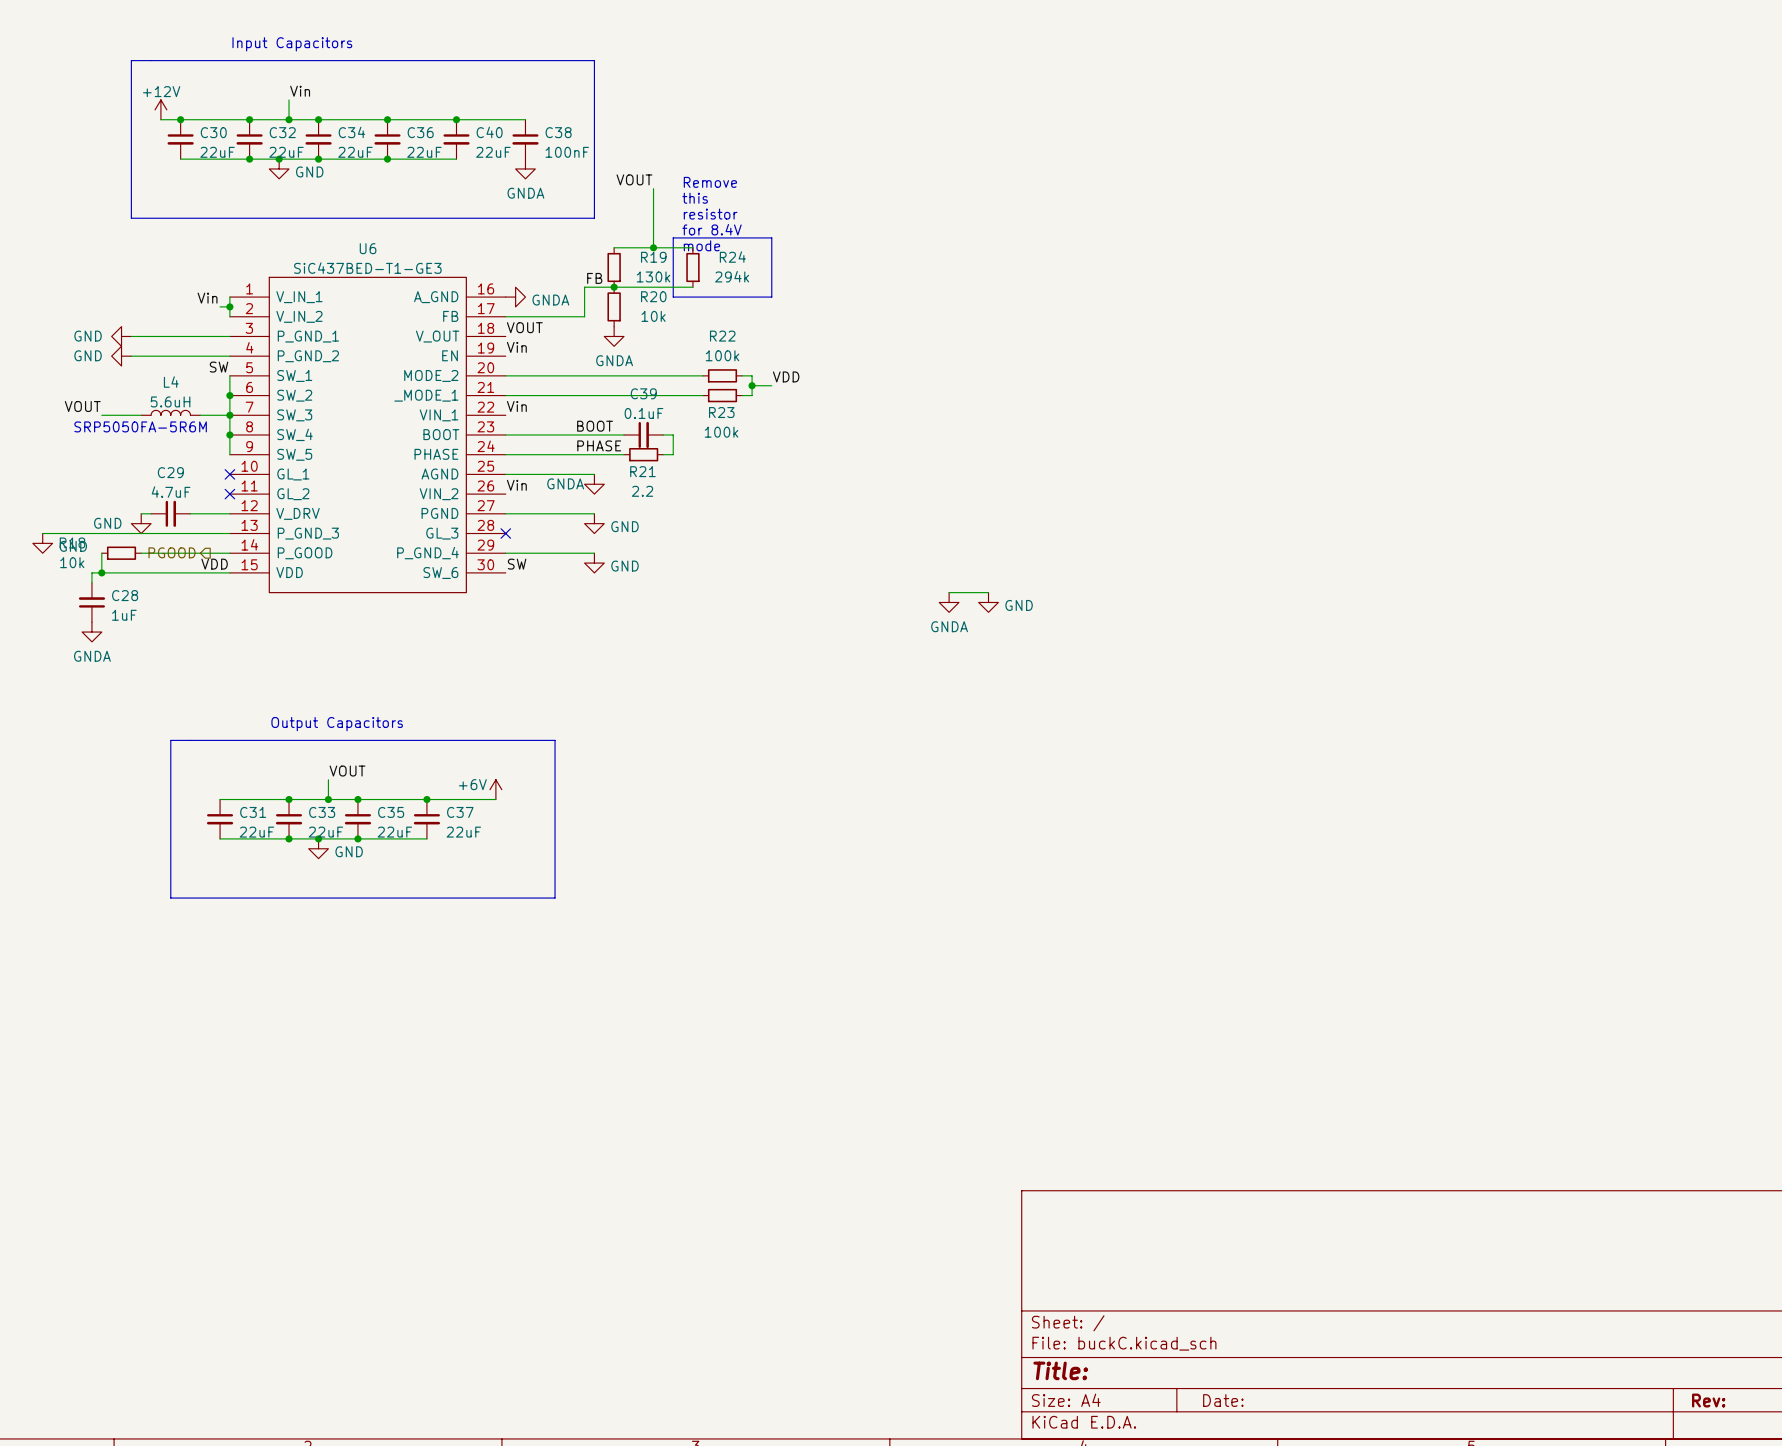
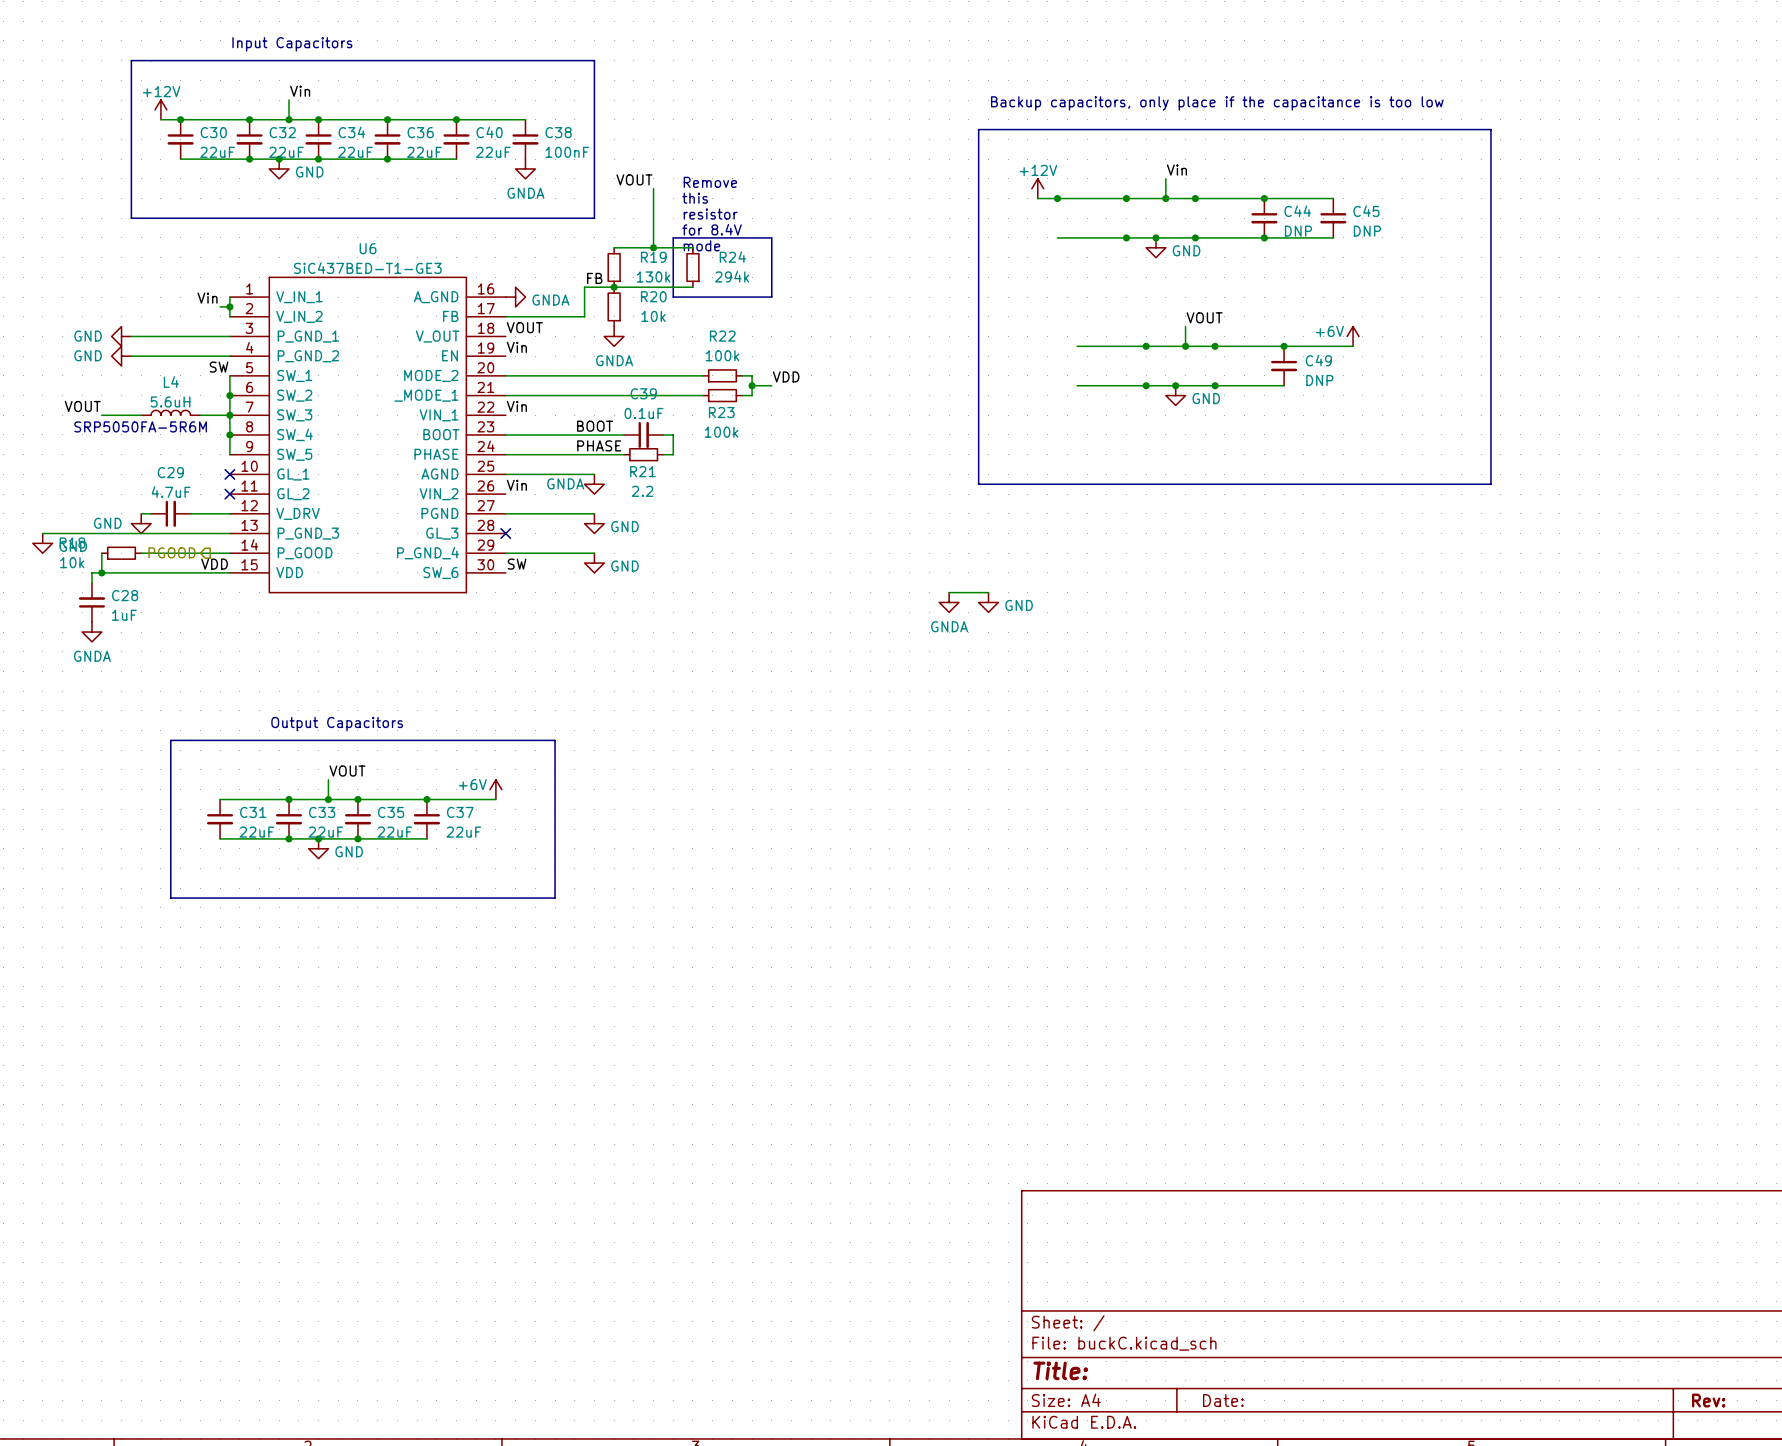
text: none -> Backup capacitors, only place if the capacitance is too low (1217, 103)
line: none -> (978, 129) (1490, 129) (1490, 484) (978, 484) (978, 129)
label: none -> Vin (1176, 170)
wire: none -> (1165, 178) (1165, 198)
power symbol: none -> +12V (1037, 188)
wire: none -> (1037, 198) (1333, 198)
junction: none -> (1057, 198)
junction: none -> (1126, 198)
junction: none -> (1165, 198)
junction: none -> (1195, 198)
junction: none -> (1264, 198)
C44: none -> DNP (1264, 218)
C45: none -> DNP (1333, 218)
wire: none -> (1057, 237) (1333, 237)
junction: none -> (1126, 237)
junction: none -> (1156, 237)
junction: none -> (1195, 237)
junction: none -> (1264, 237)
power symbol: none -> GND (1156, 247)
label: none -> VOUT (1204, 317)
wire: none -> (1185, 326) (1185, 346)
power symbol: none -> +6V (1353, 336)
wire: none -> (1077, 346) (1353, 346)
junction: none -> (1146, 346)
junction: none -> (1185, 346)
junction: none -> (1215, 346)
junction: none -> (1284, 346)
C49: none -> DNP (1284, 366)
wire: none -> (1077, 385) (1284, 385)
junction: none -> (1146, 385)
junction: none -> (1175, 385)
junction: none -> (1215, 385)
power symbol: none -> GND (1175, 395)

